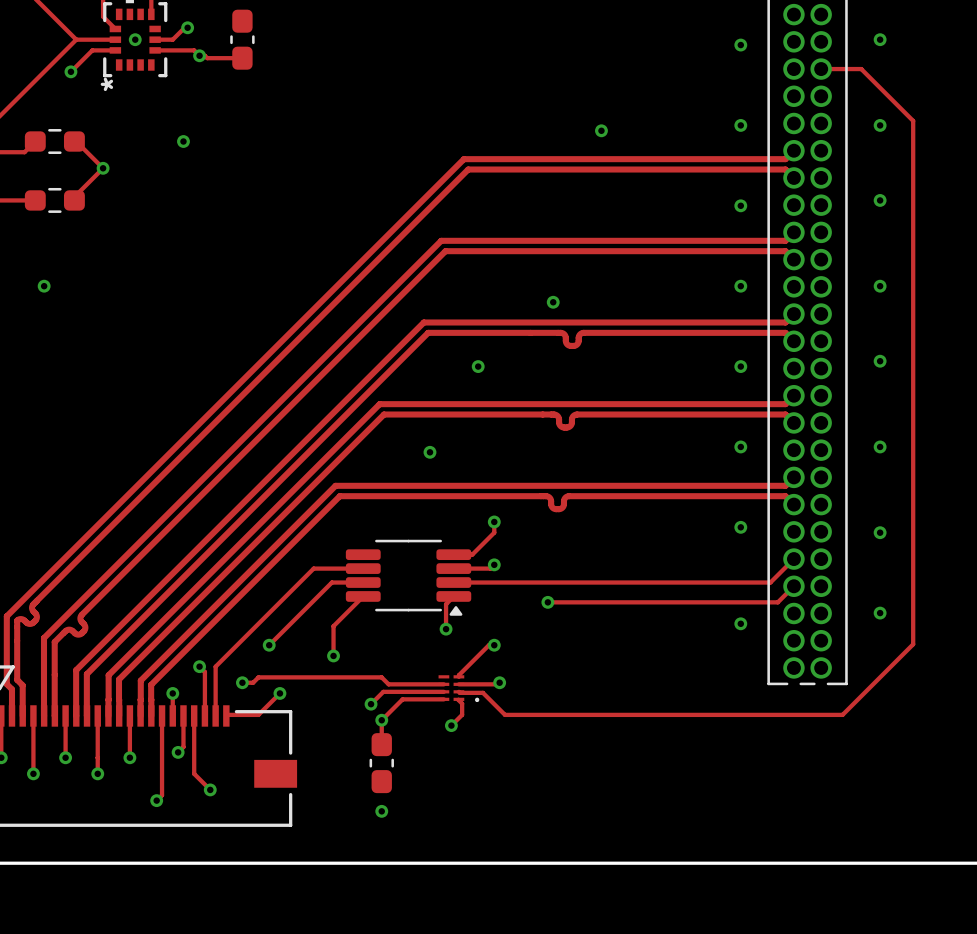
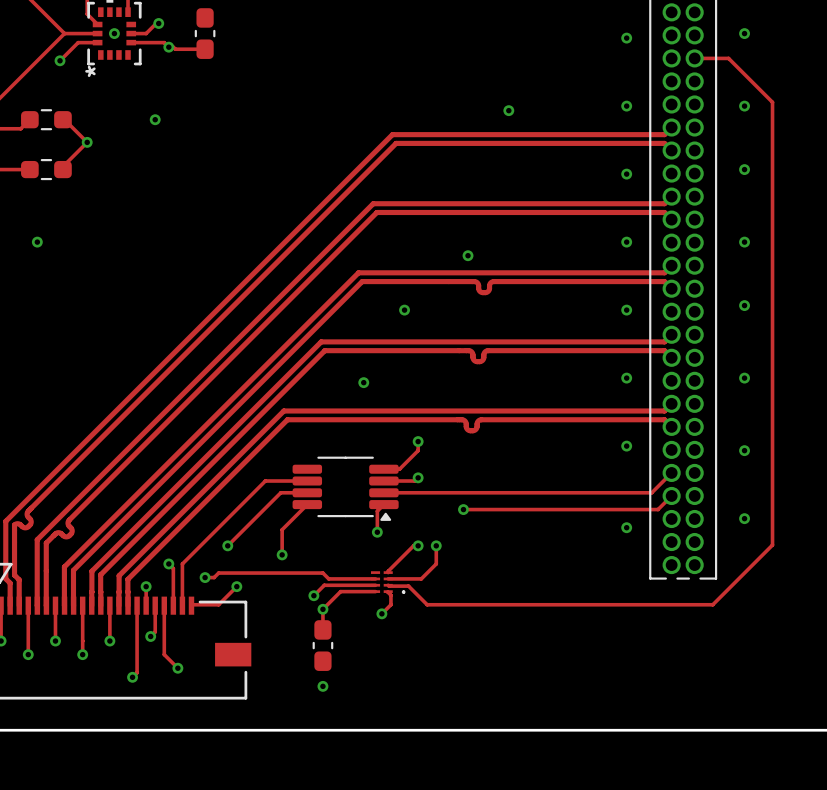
track: none -> (436, 545) (436, 563) (422, 577)
via position: (499, 682) -> (436, 545)

